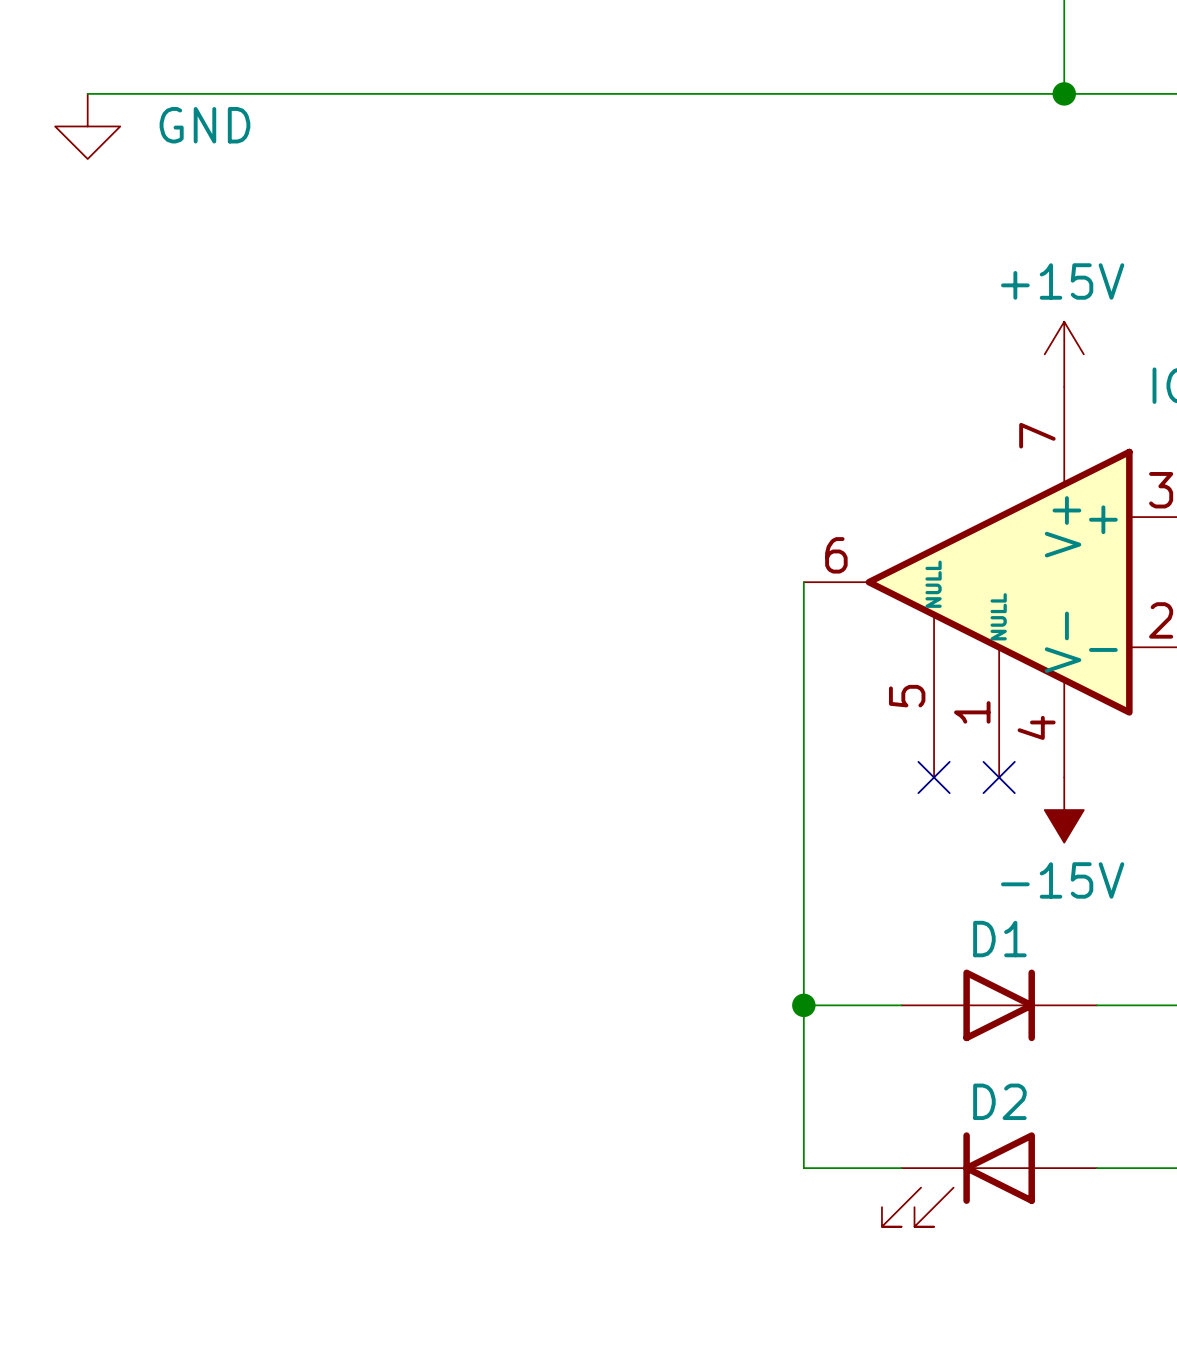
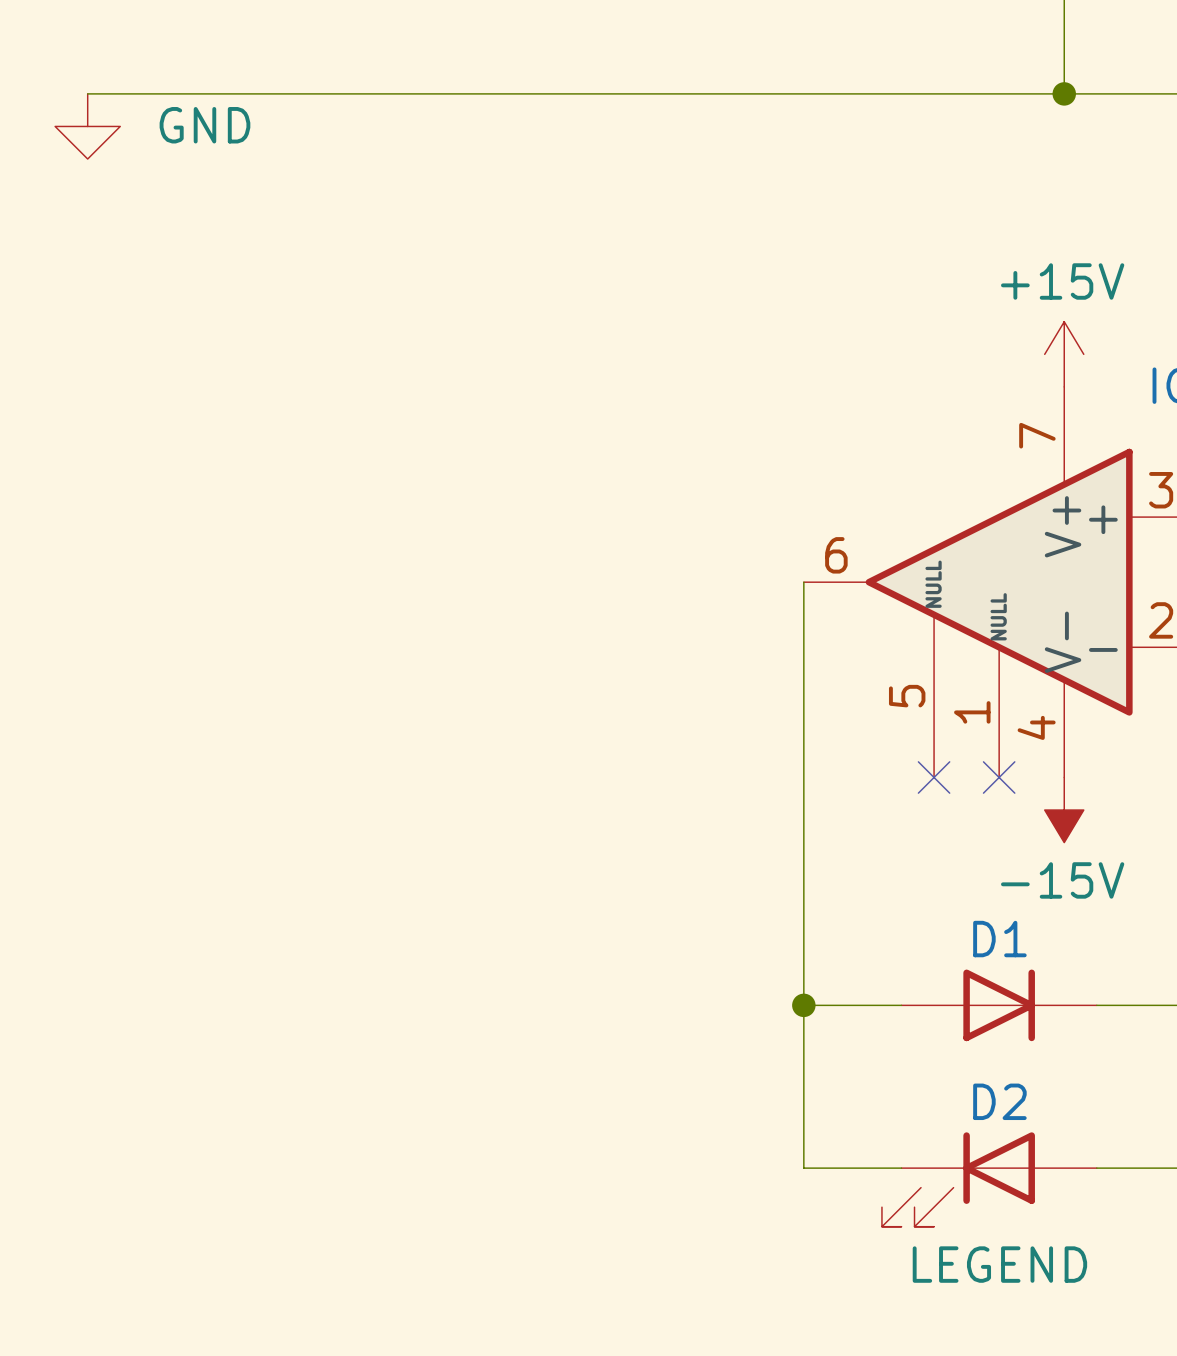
D2 text: none -> LEGEND (999, 1264)

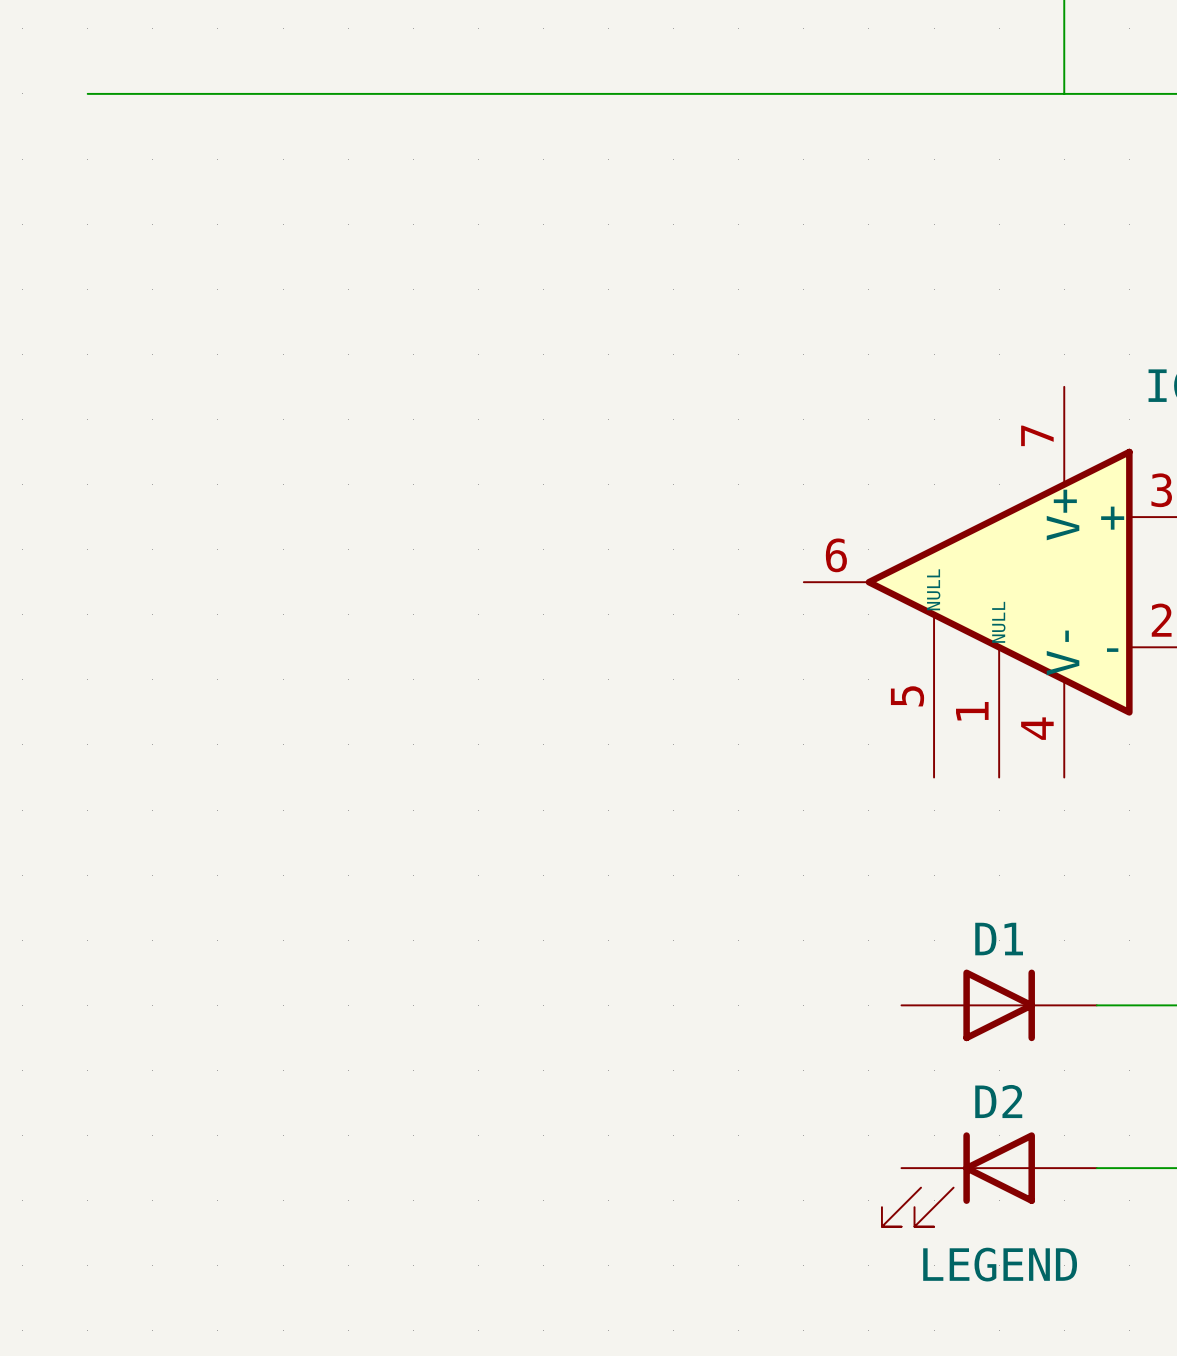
junction: (1064, 93) -> none
power symbol: GND (87, 126) -> none
power symbol: +15V (1064, 354) -> none
wire: (803, 582) (803, 1168) (901, 1168) -> none
no-connect mark: (934, 777) -> none
no-connect mark: (999, 777) -> none
power symbol: -15V (1064, 810) -> none
wire: (803, 1005) (901, 1005) -> none
junction: (803, 1005) -> none

